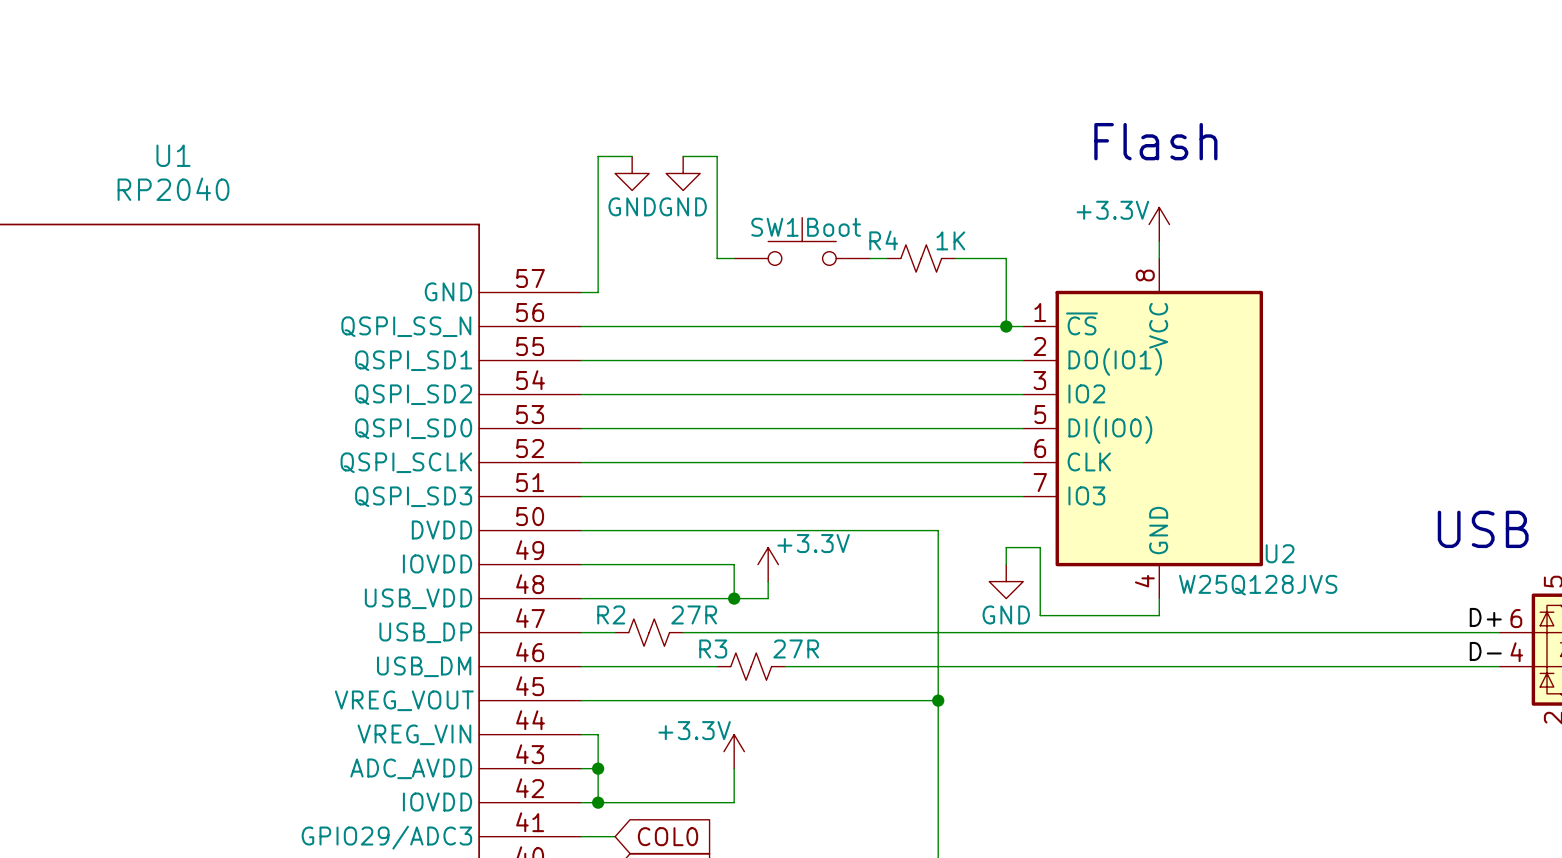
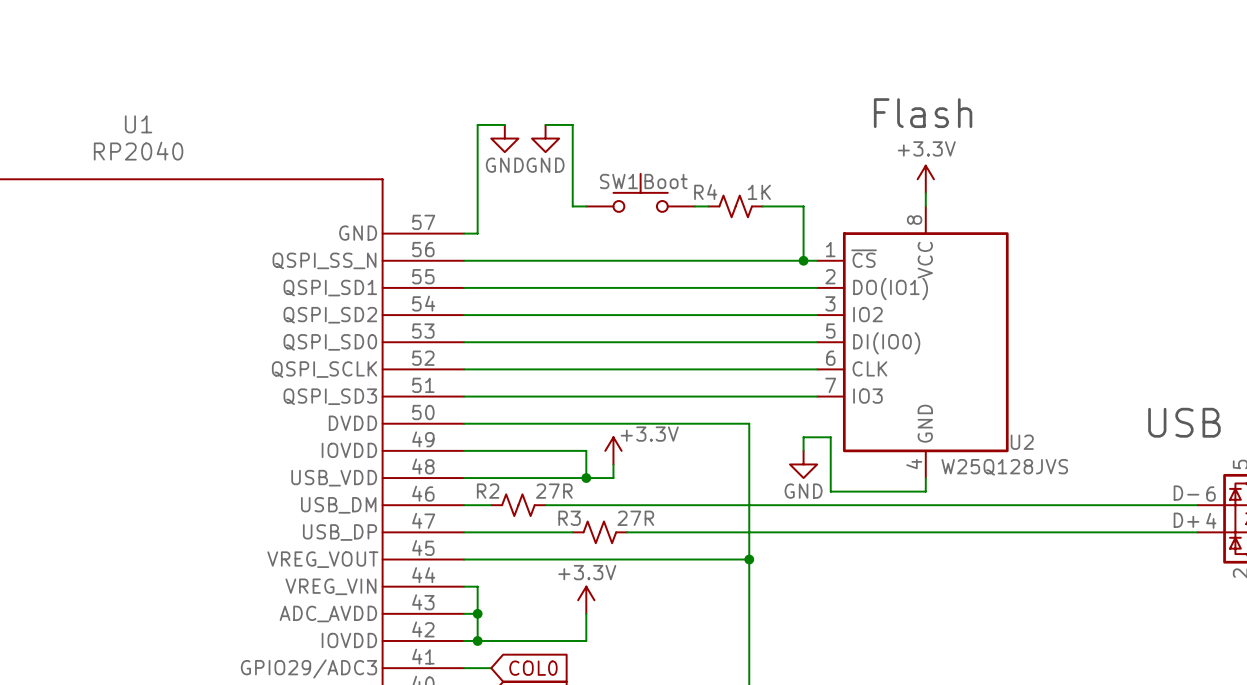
power symbol text position: +3.3V (1112, 210) -> +3.3V (926, 148)
label: D+ (1485, 617) -> D- (1186, 493)
U1 pin number: 47 (530, 618) -> 46 (423, 493)
U1 pin name: USB_DP (425, 632) -> USB_DM (338, 505)
label: D- (1485, 651) -> D+ (1186, 520)
U1 pin number: 46 (530, 652) -> 47 (423, 520)
U1 pin name: USB_DM (424, 666) -> USB_DP (340, 532)
power symbol text position: +3.3V (694, 730) -> +3.3V (587, 572)

